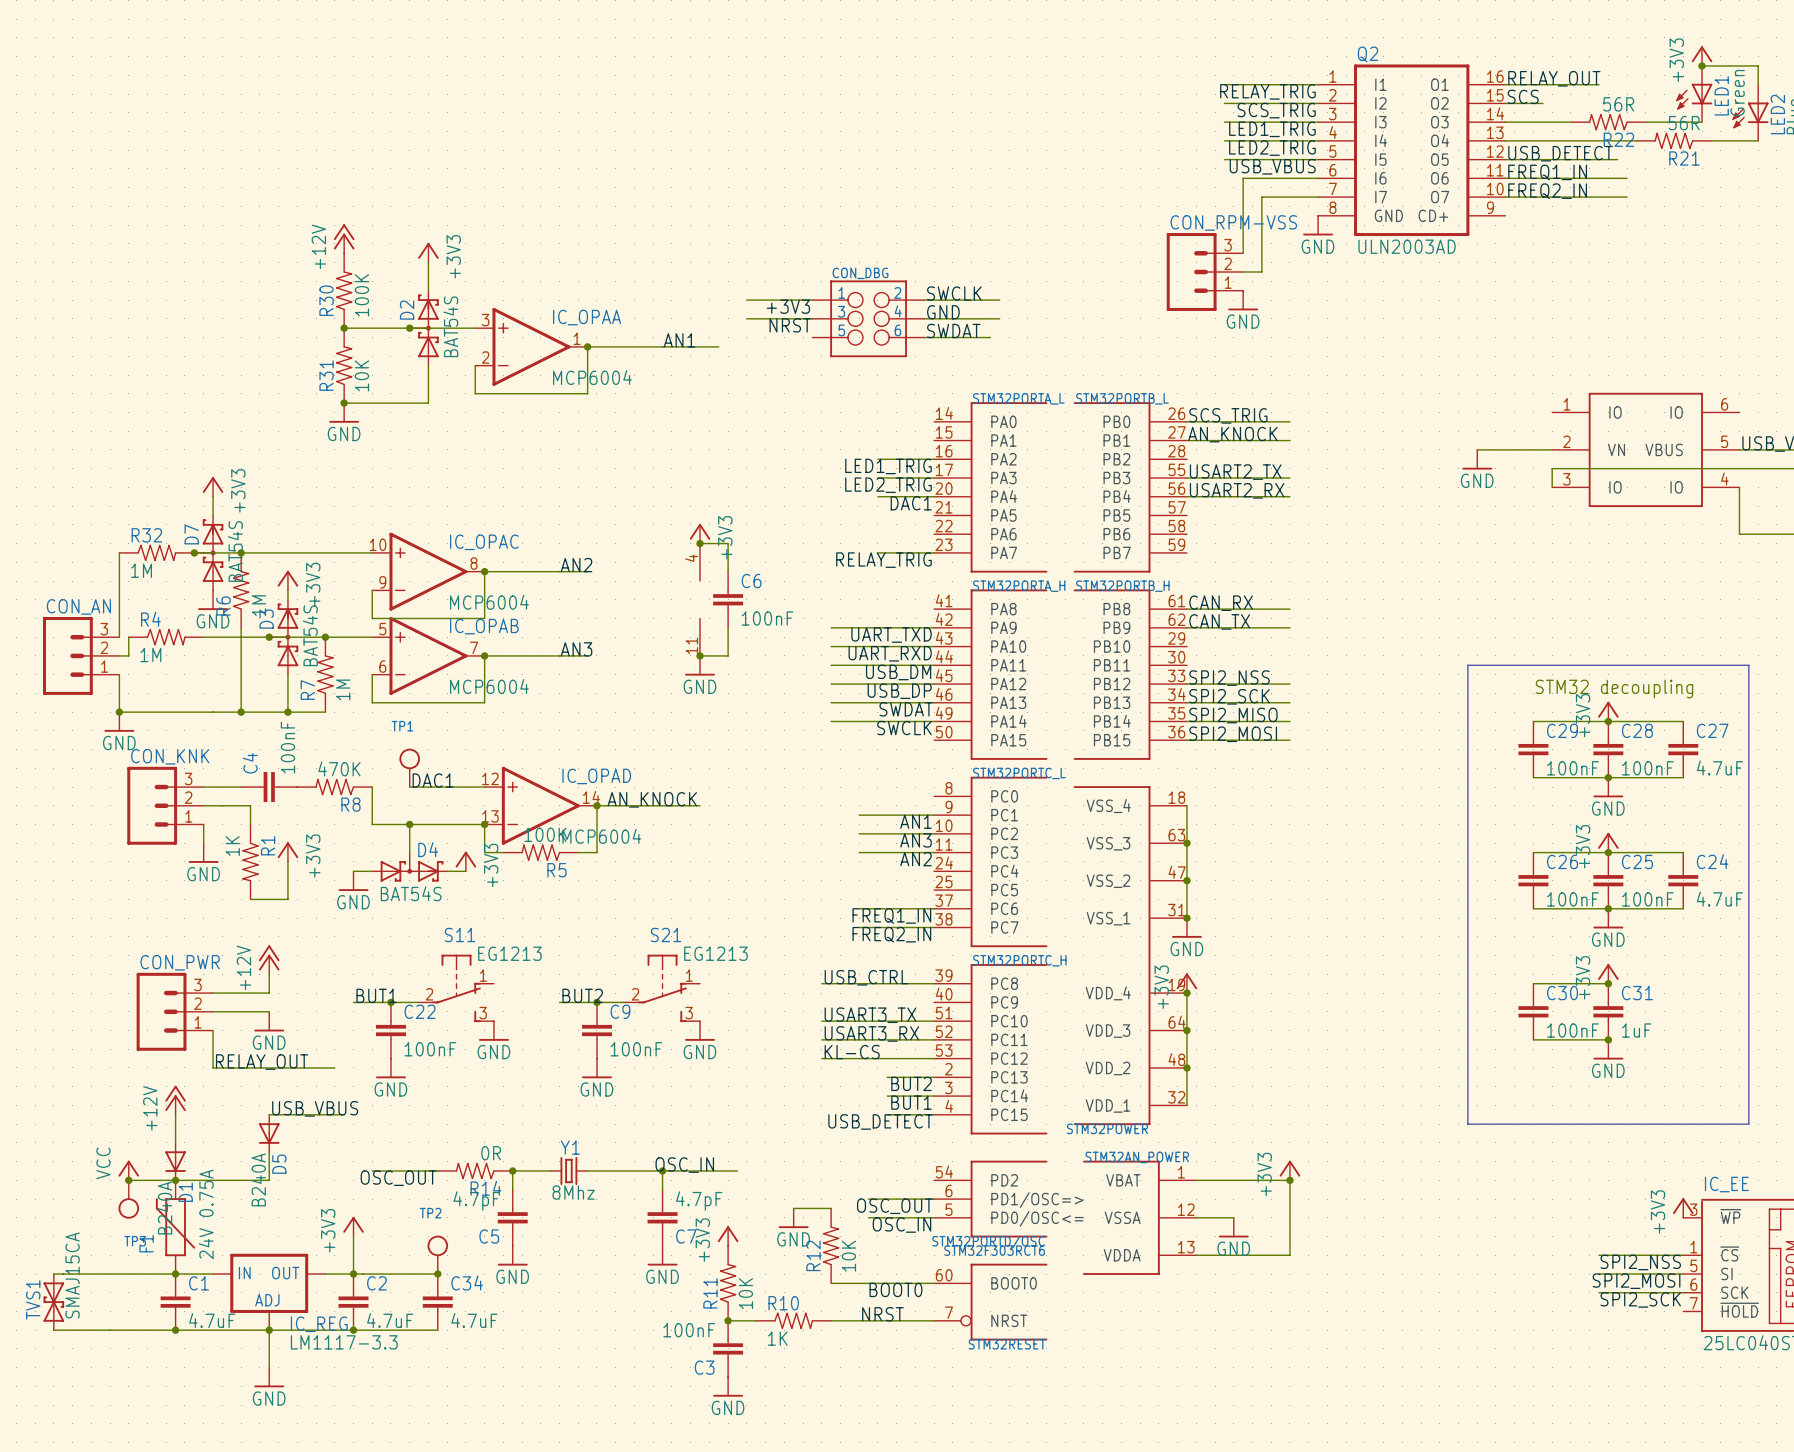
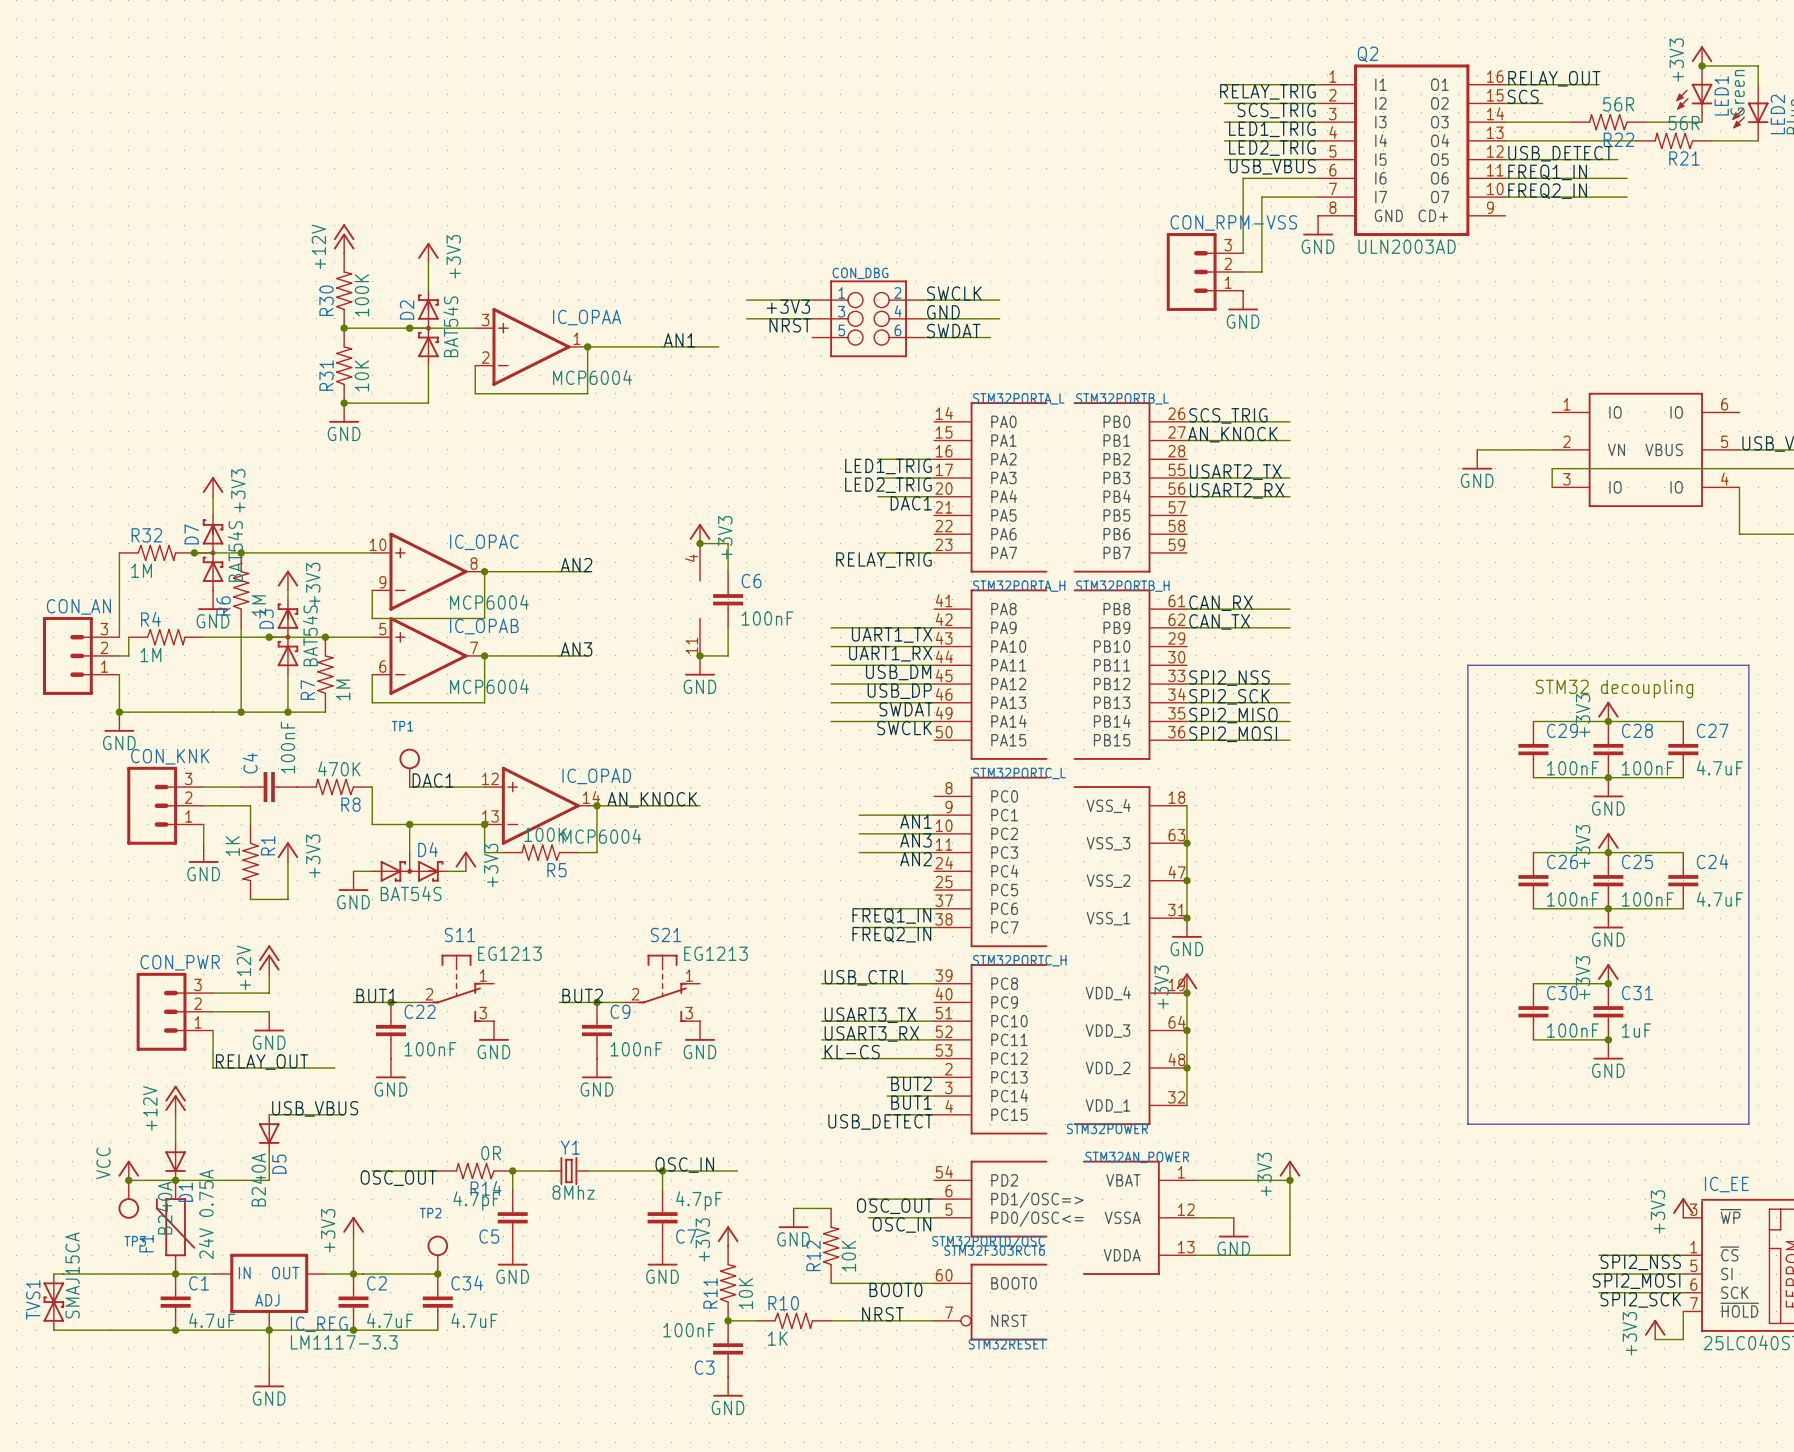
label: UART_TXD (891, 635) -> UART1_TX (892, 635)
label: UART_RXD (890, 653) -> UART1_RX (890, 653)
wire: none -> (1683, 1311) (1683, 1339) (1655, 1339)
power symbol: none -> +3V3 (1655, 1329)

